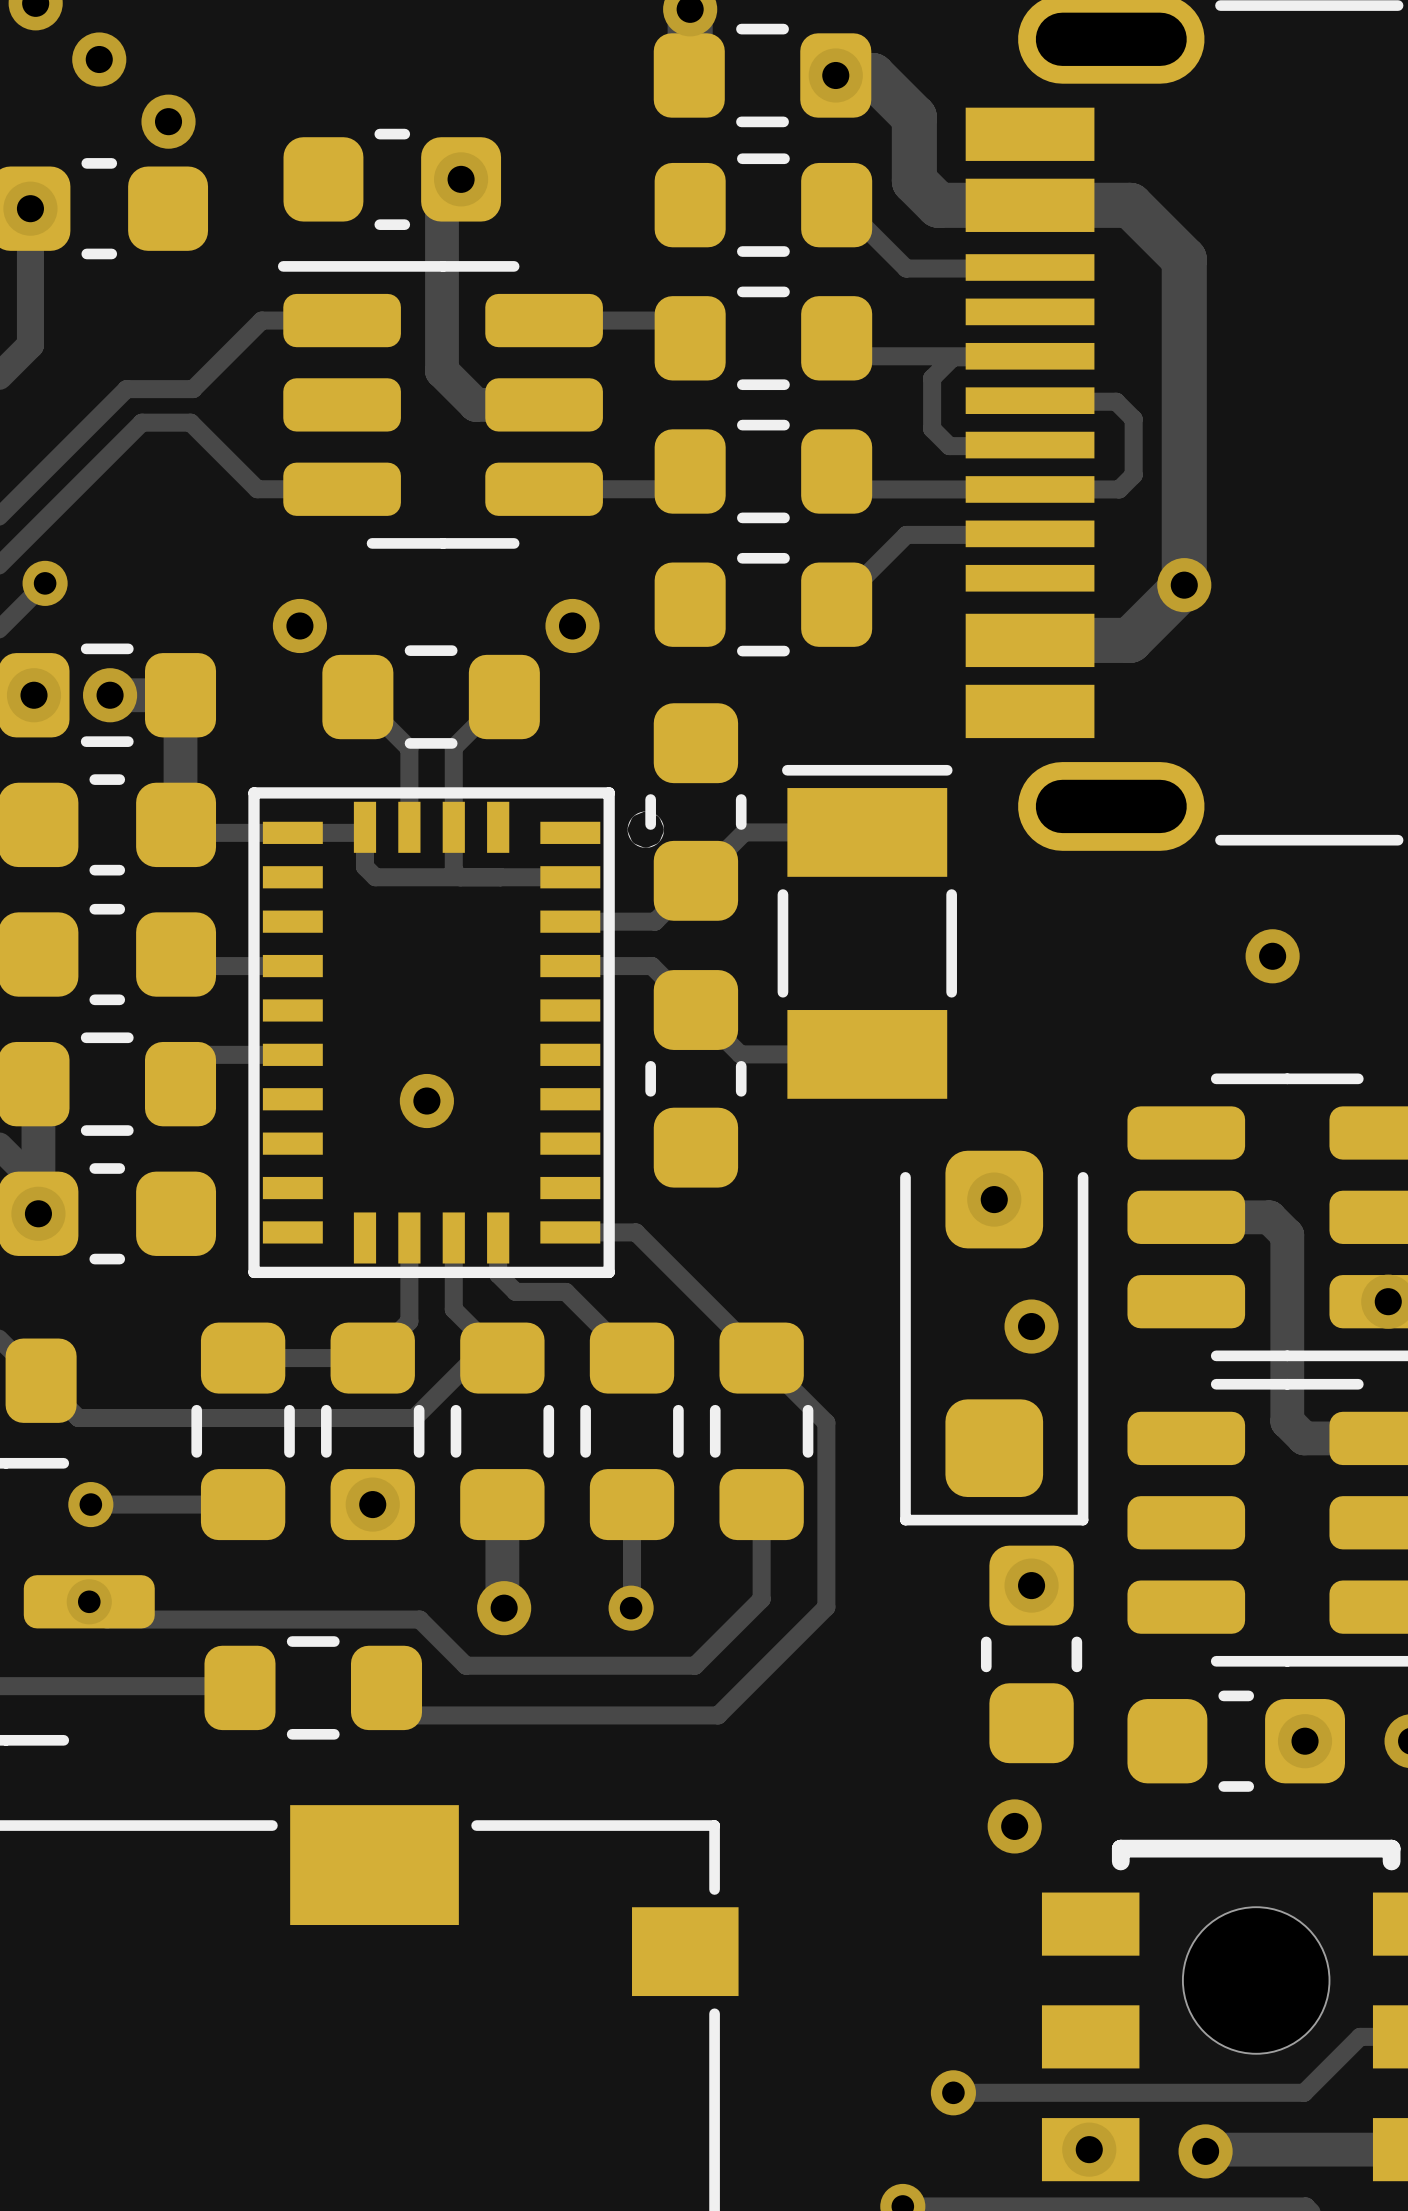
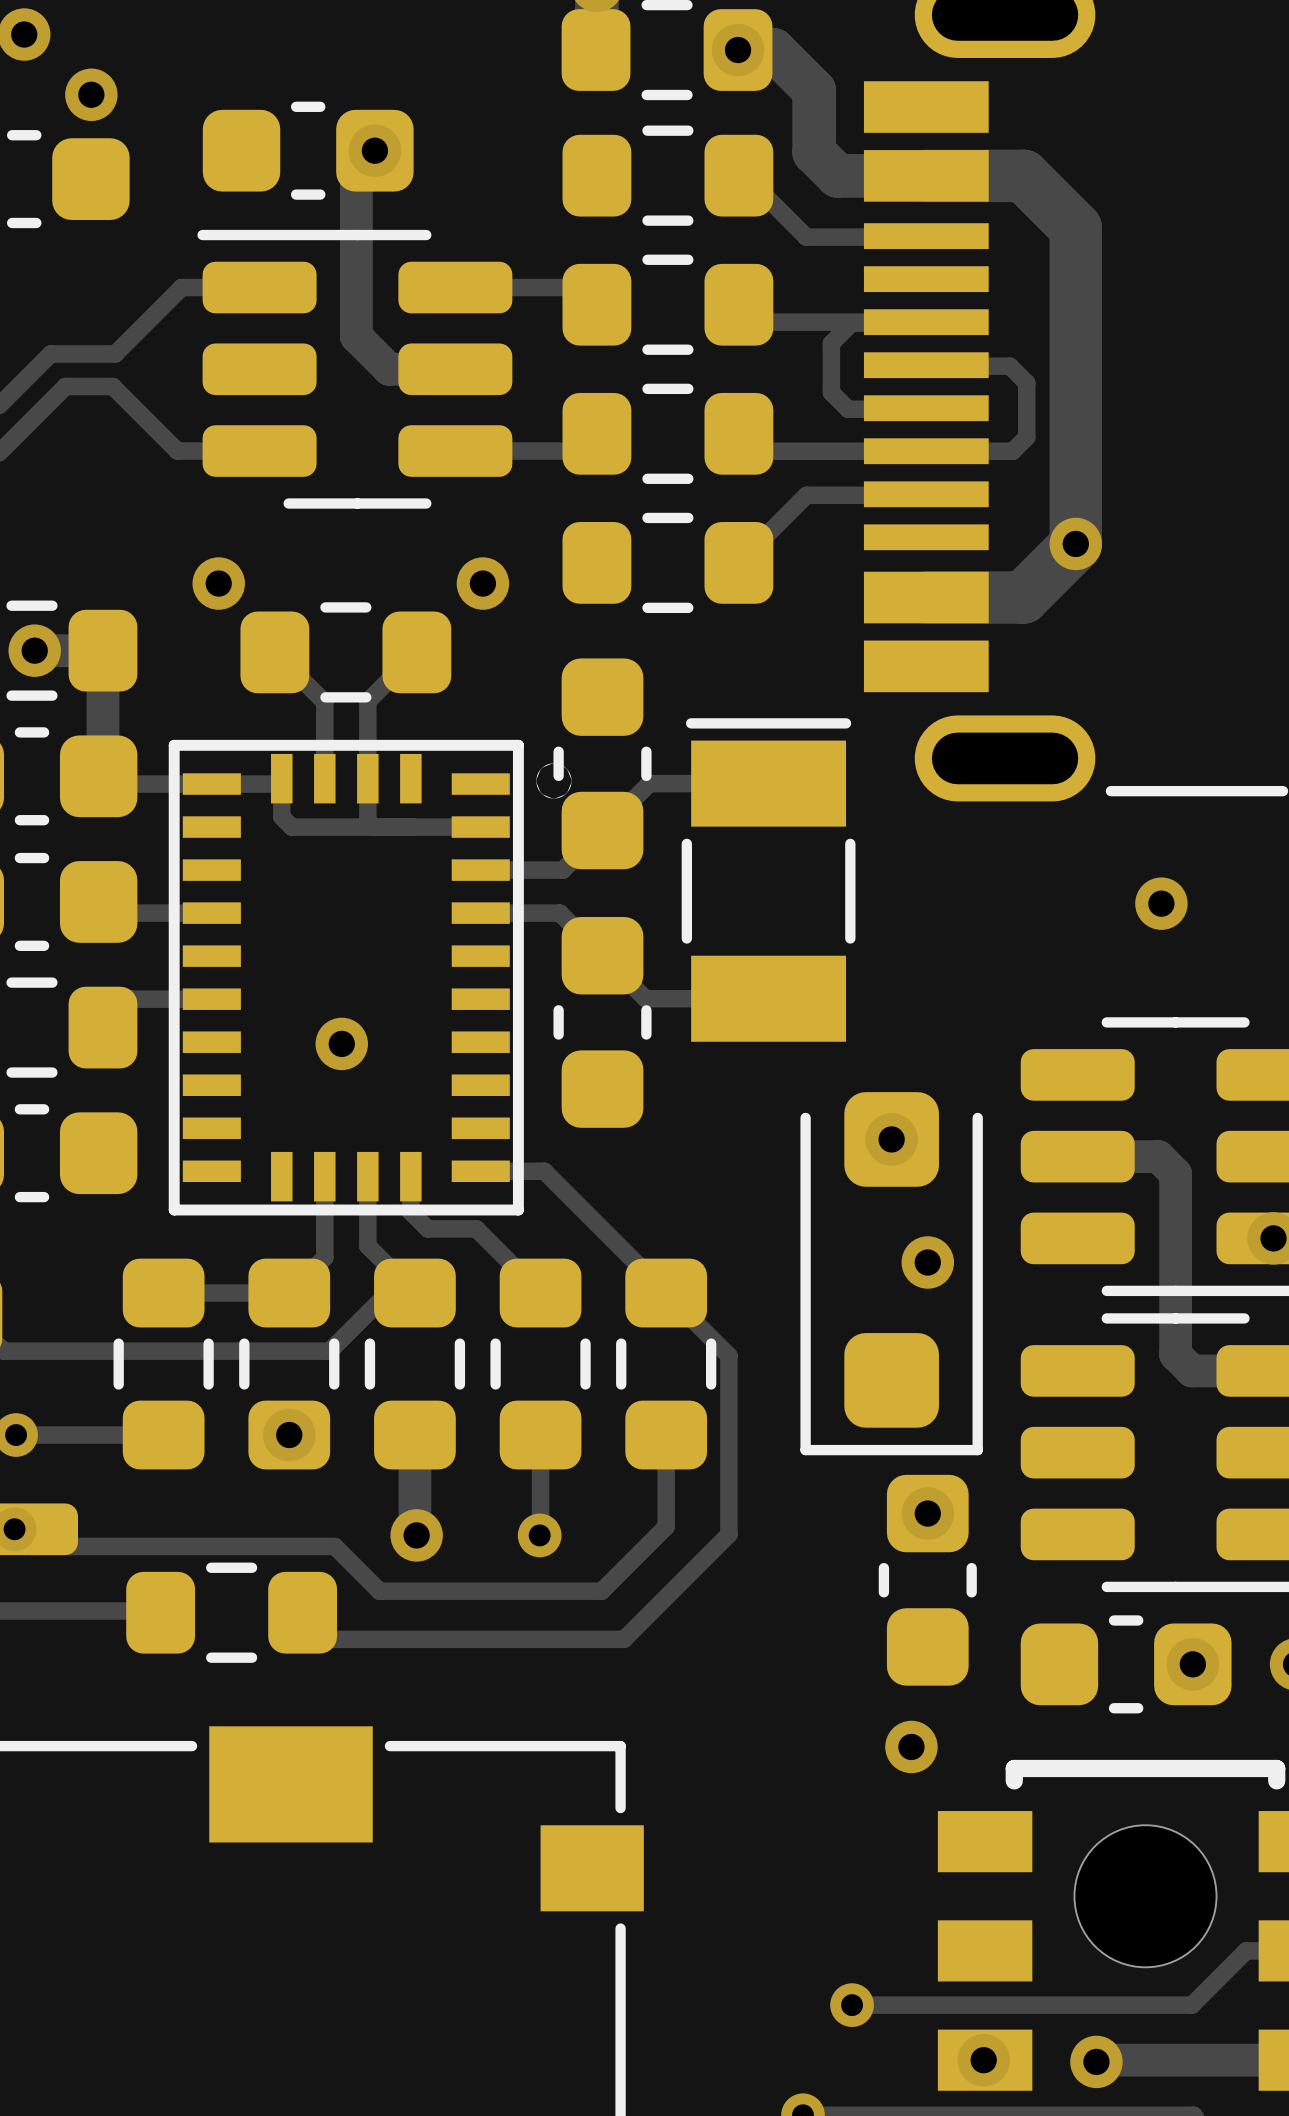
track width: thin (1030, 205) (1130, 205) (1184, 259) (1184, 585) -> thick (926, 175) (1023, 175) (1075, 228) (1075, 543)
track width: thin (1184, 586) (1129, 640) (1030, 640) -> thick (1075, 544) (1023, 597) (926, 597)

